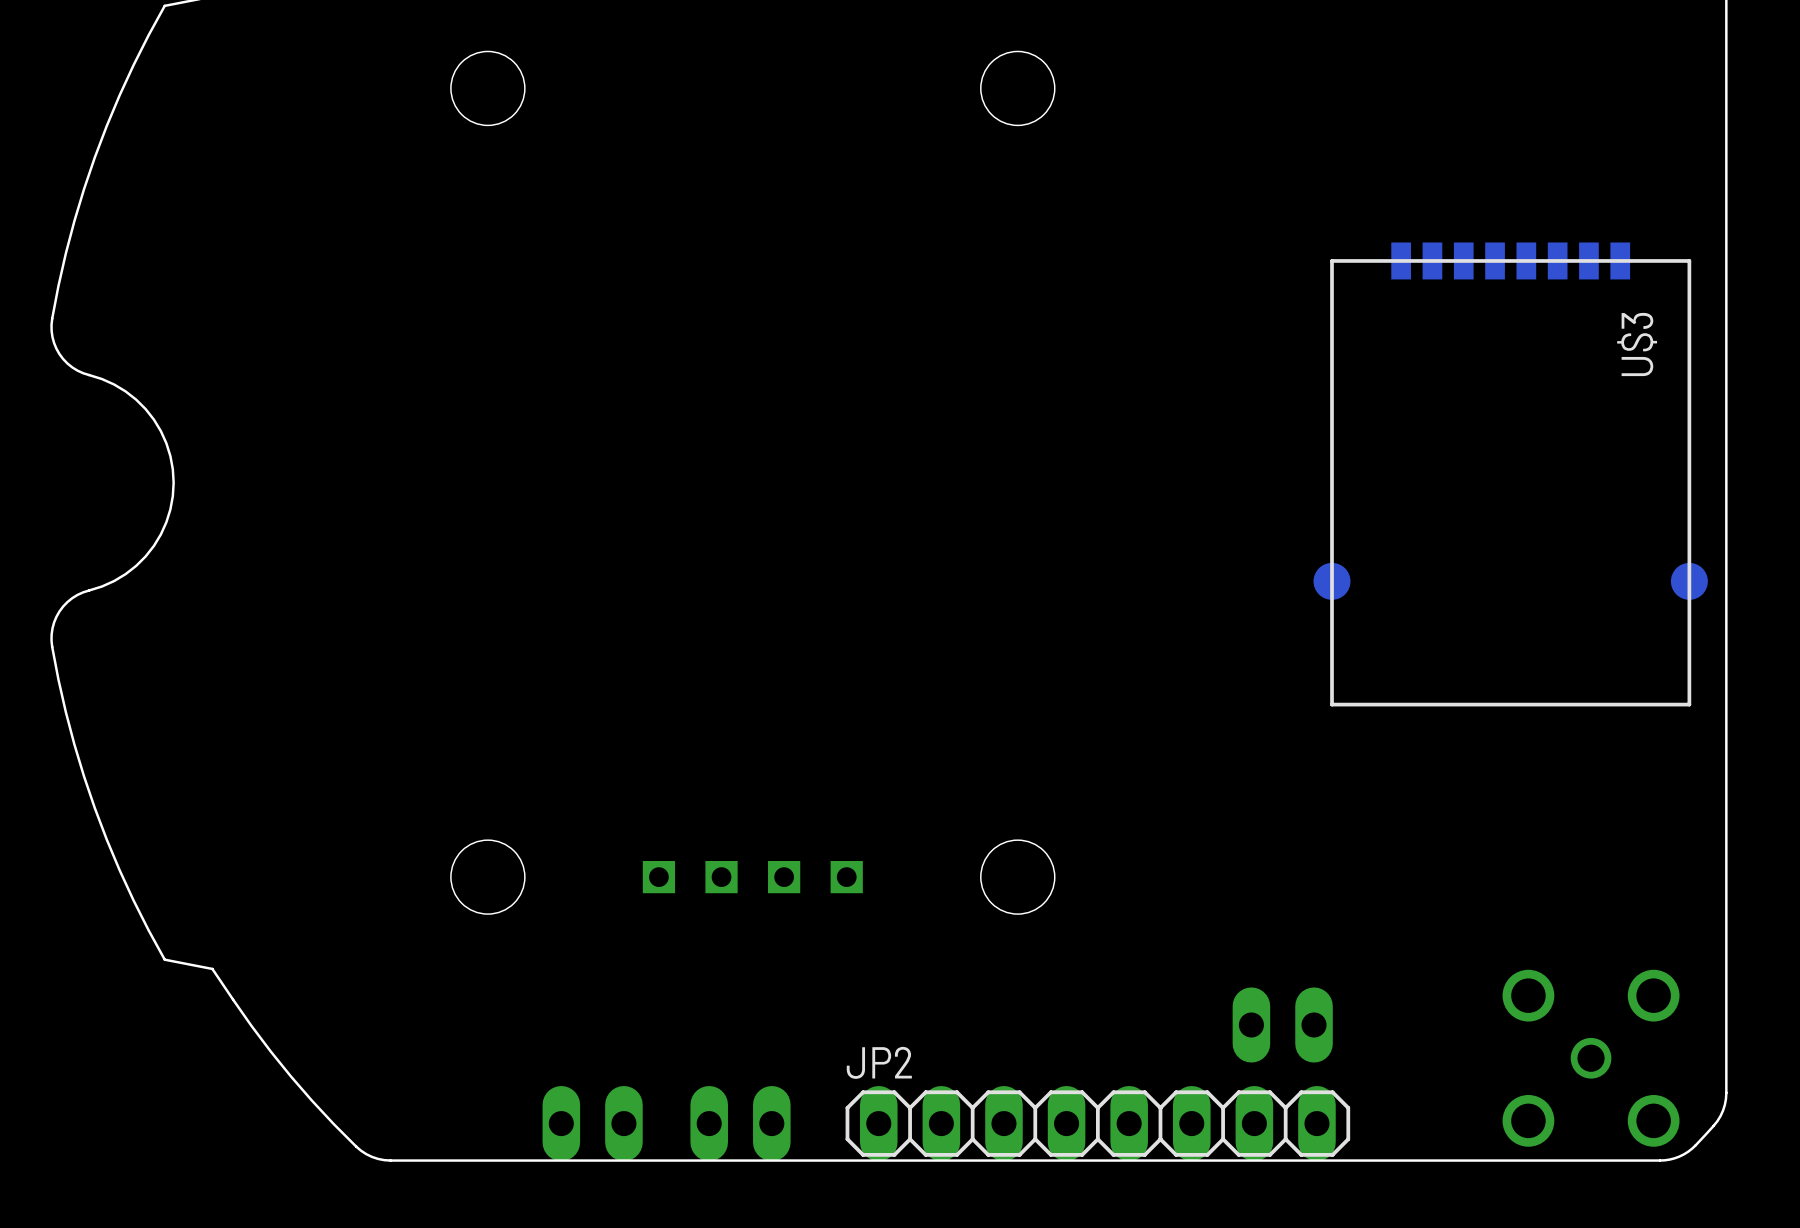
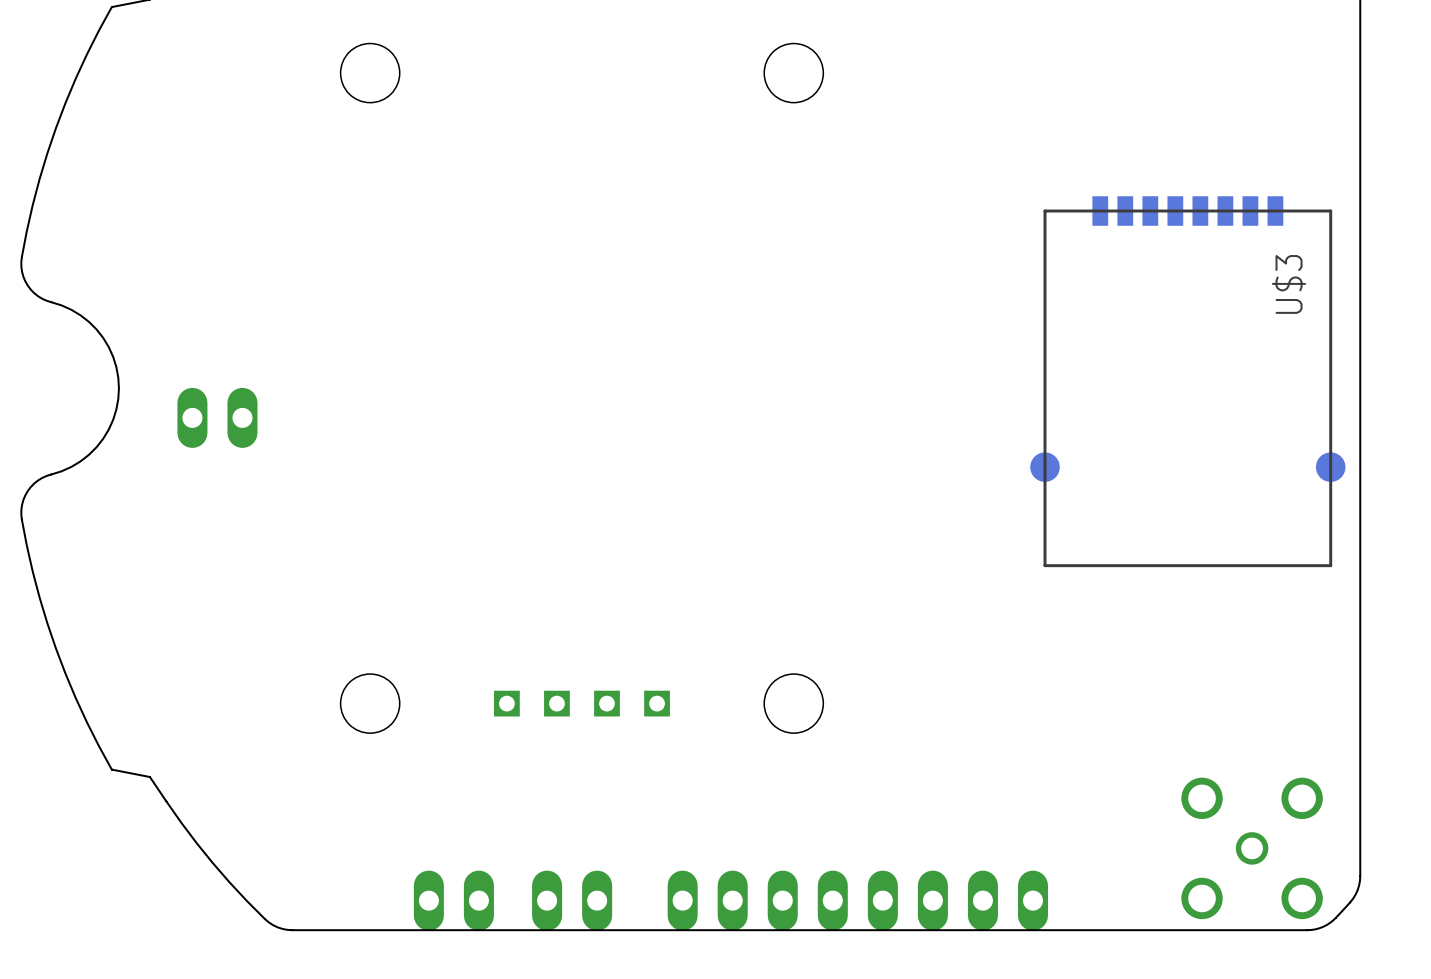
part: none -> (217, 417)
part: (1282, 1024) -> none
JP2 side: bottom (1097, 1123) -> top (857, 900)

